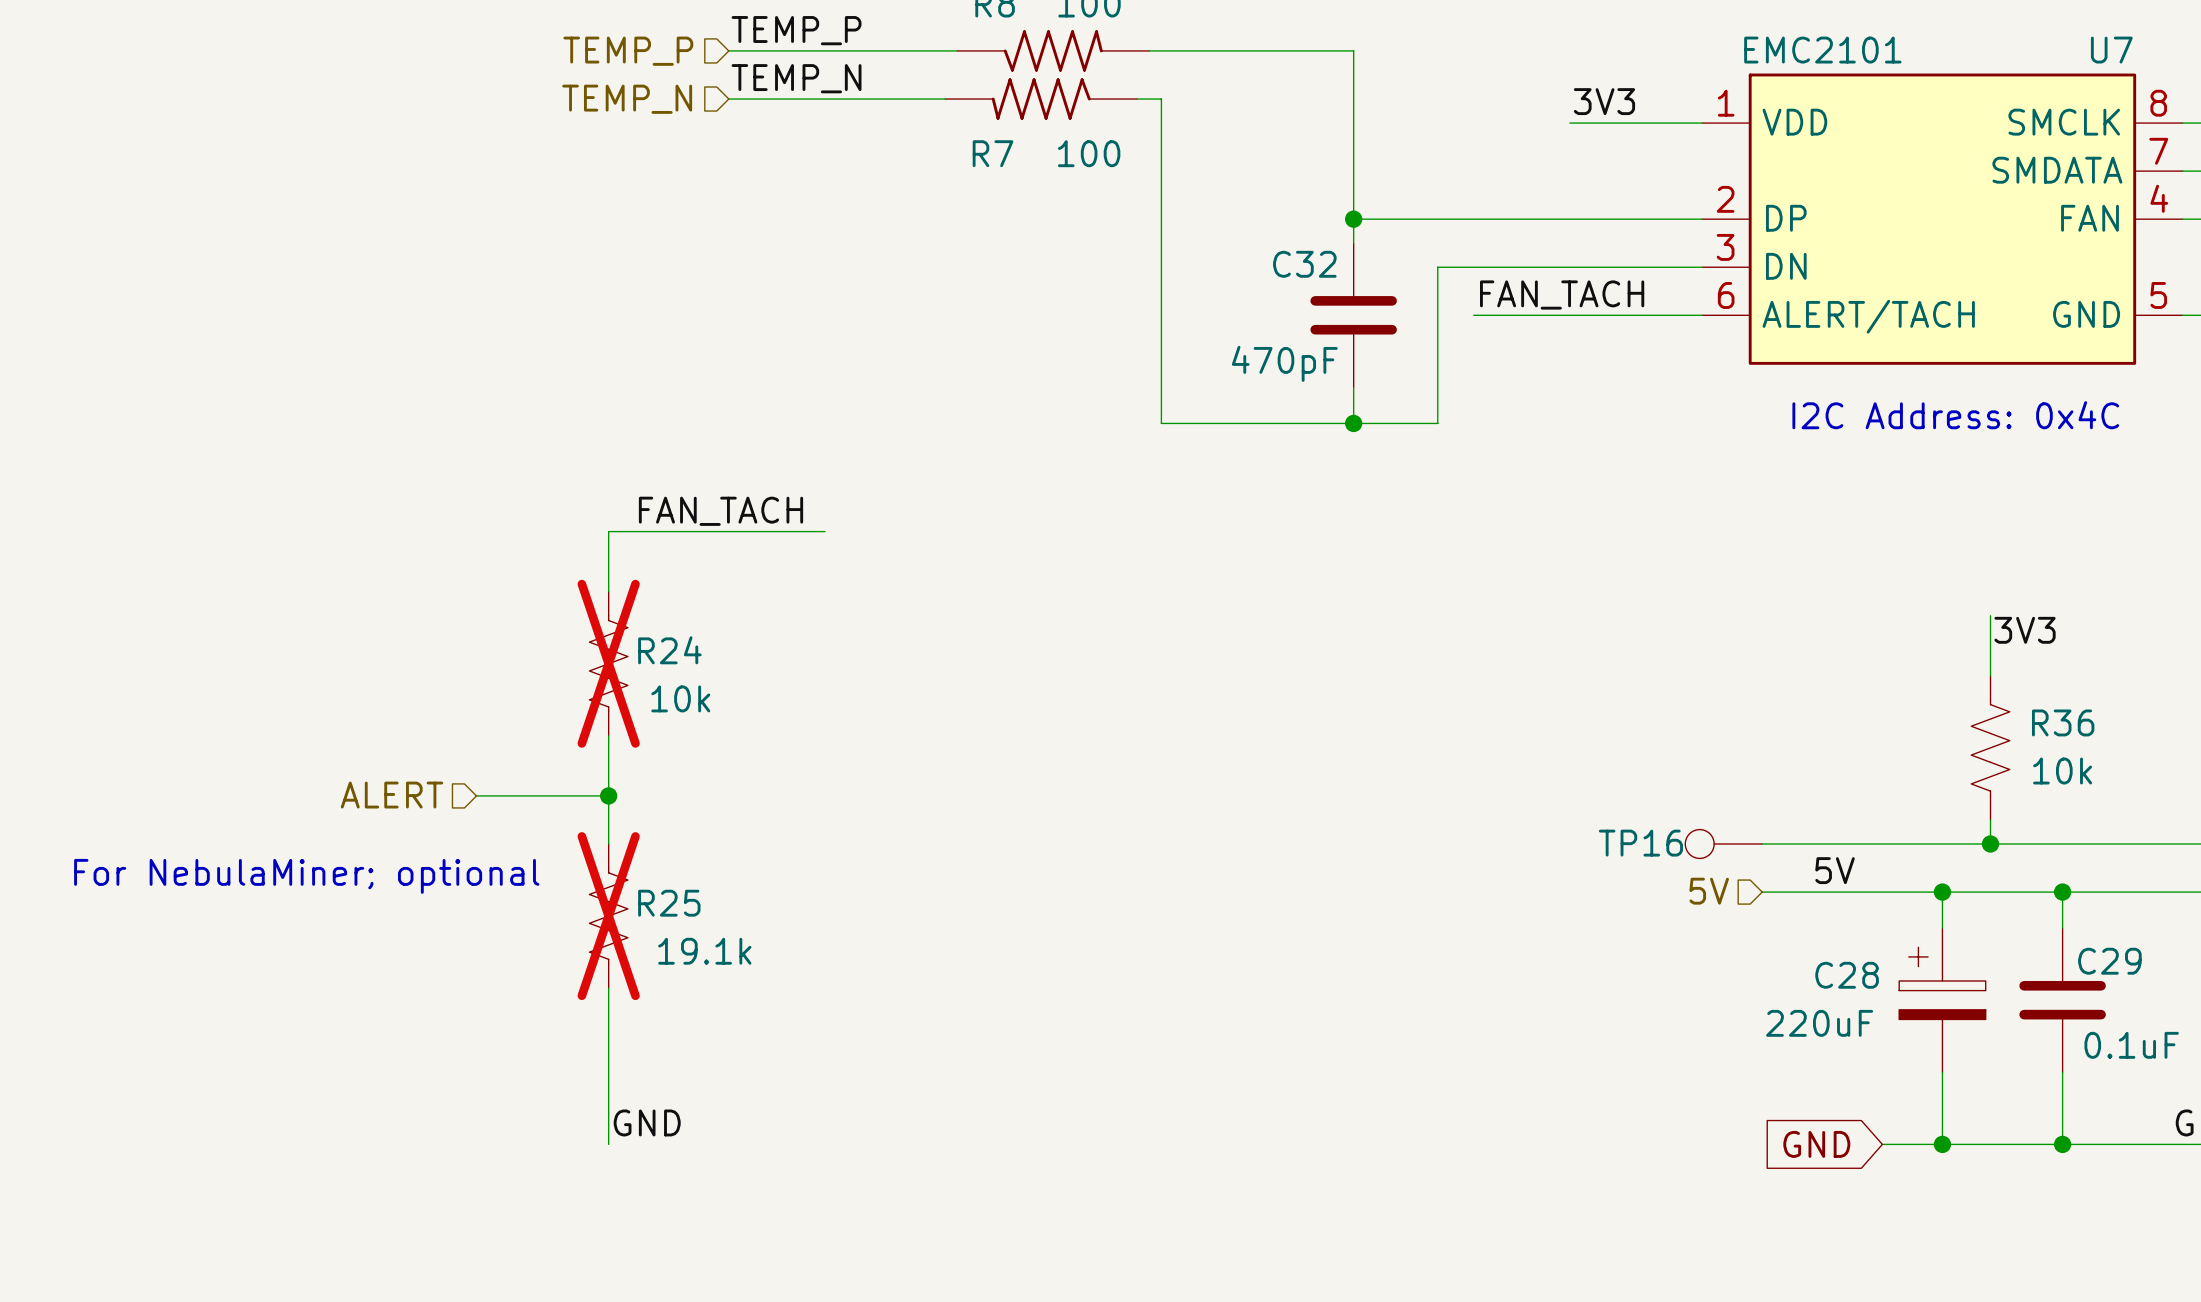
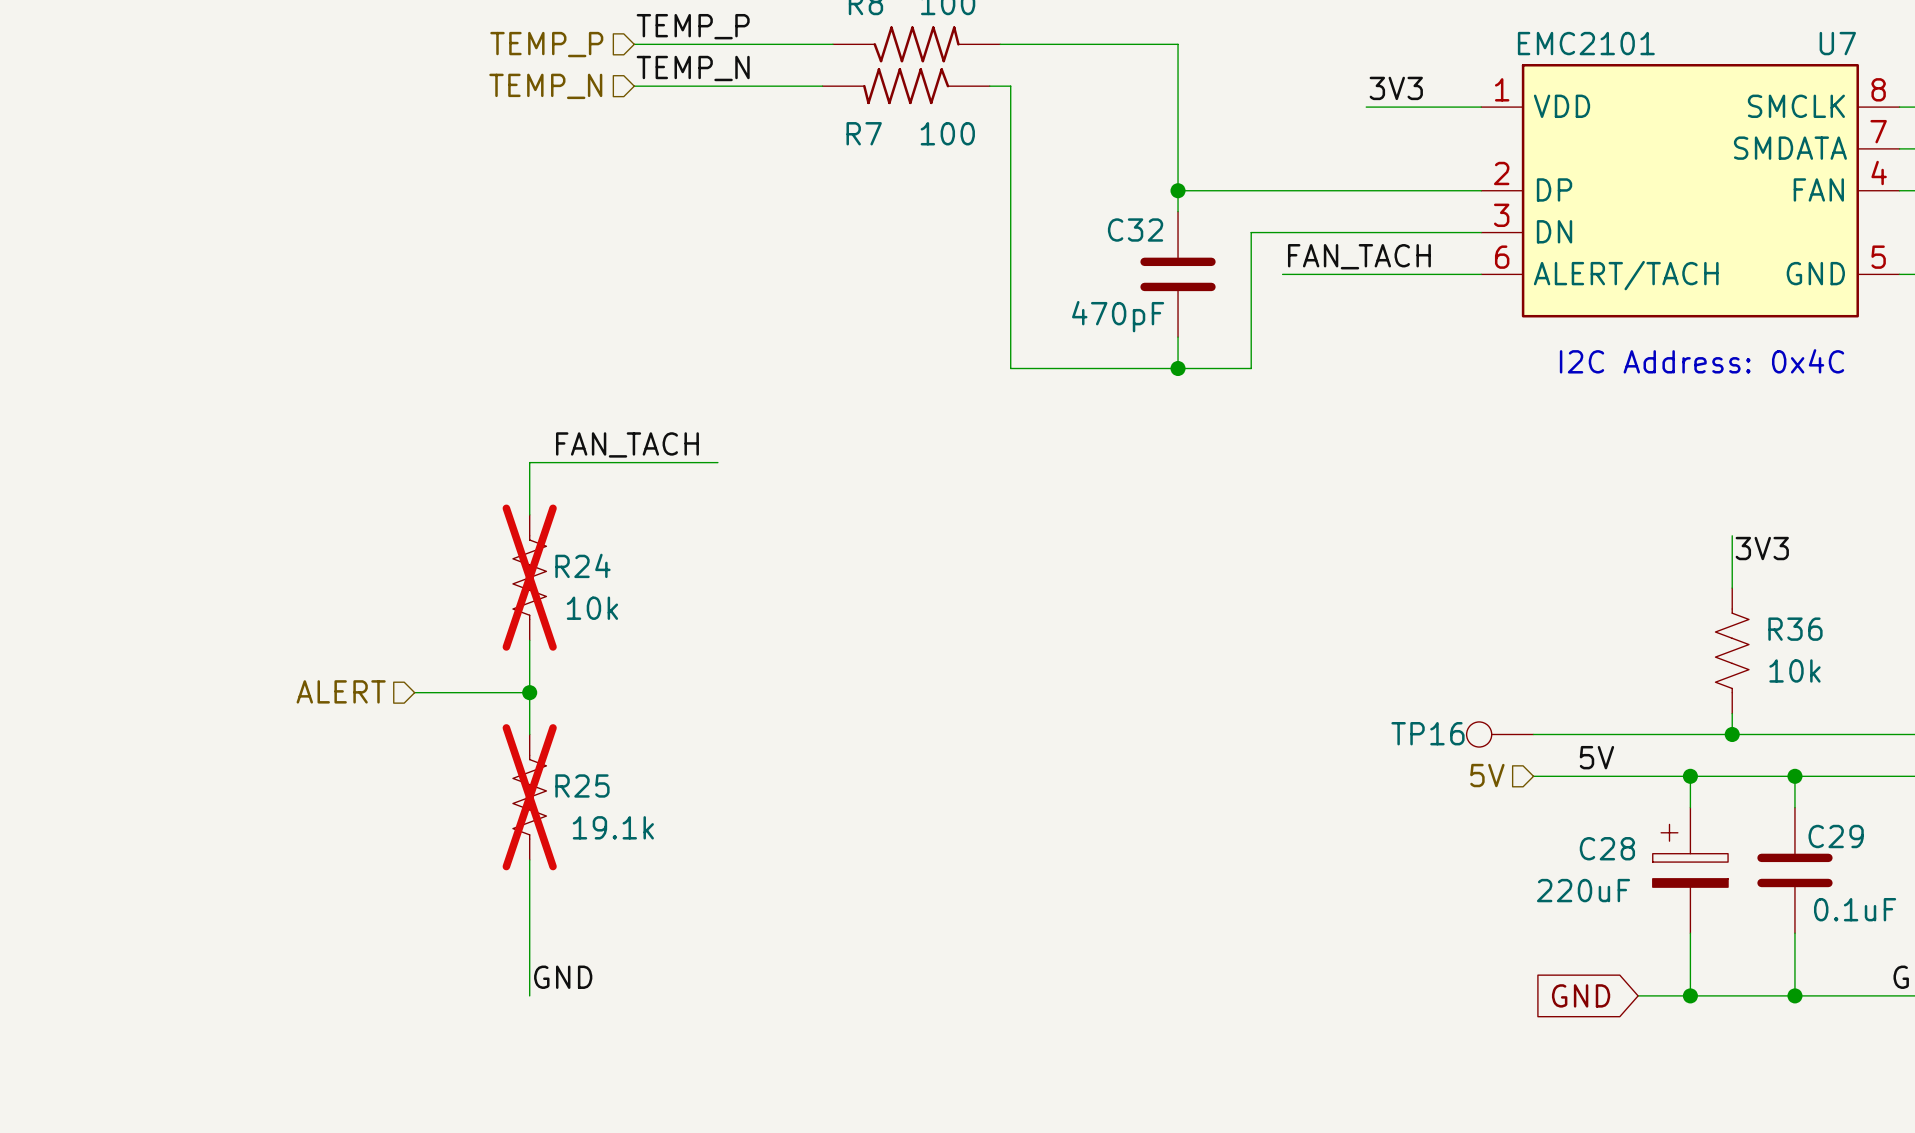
text: For NebulaMiner; optional (306, 876) -> none

